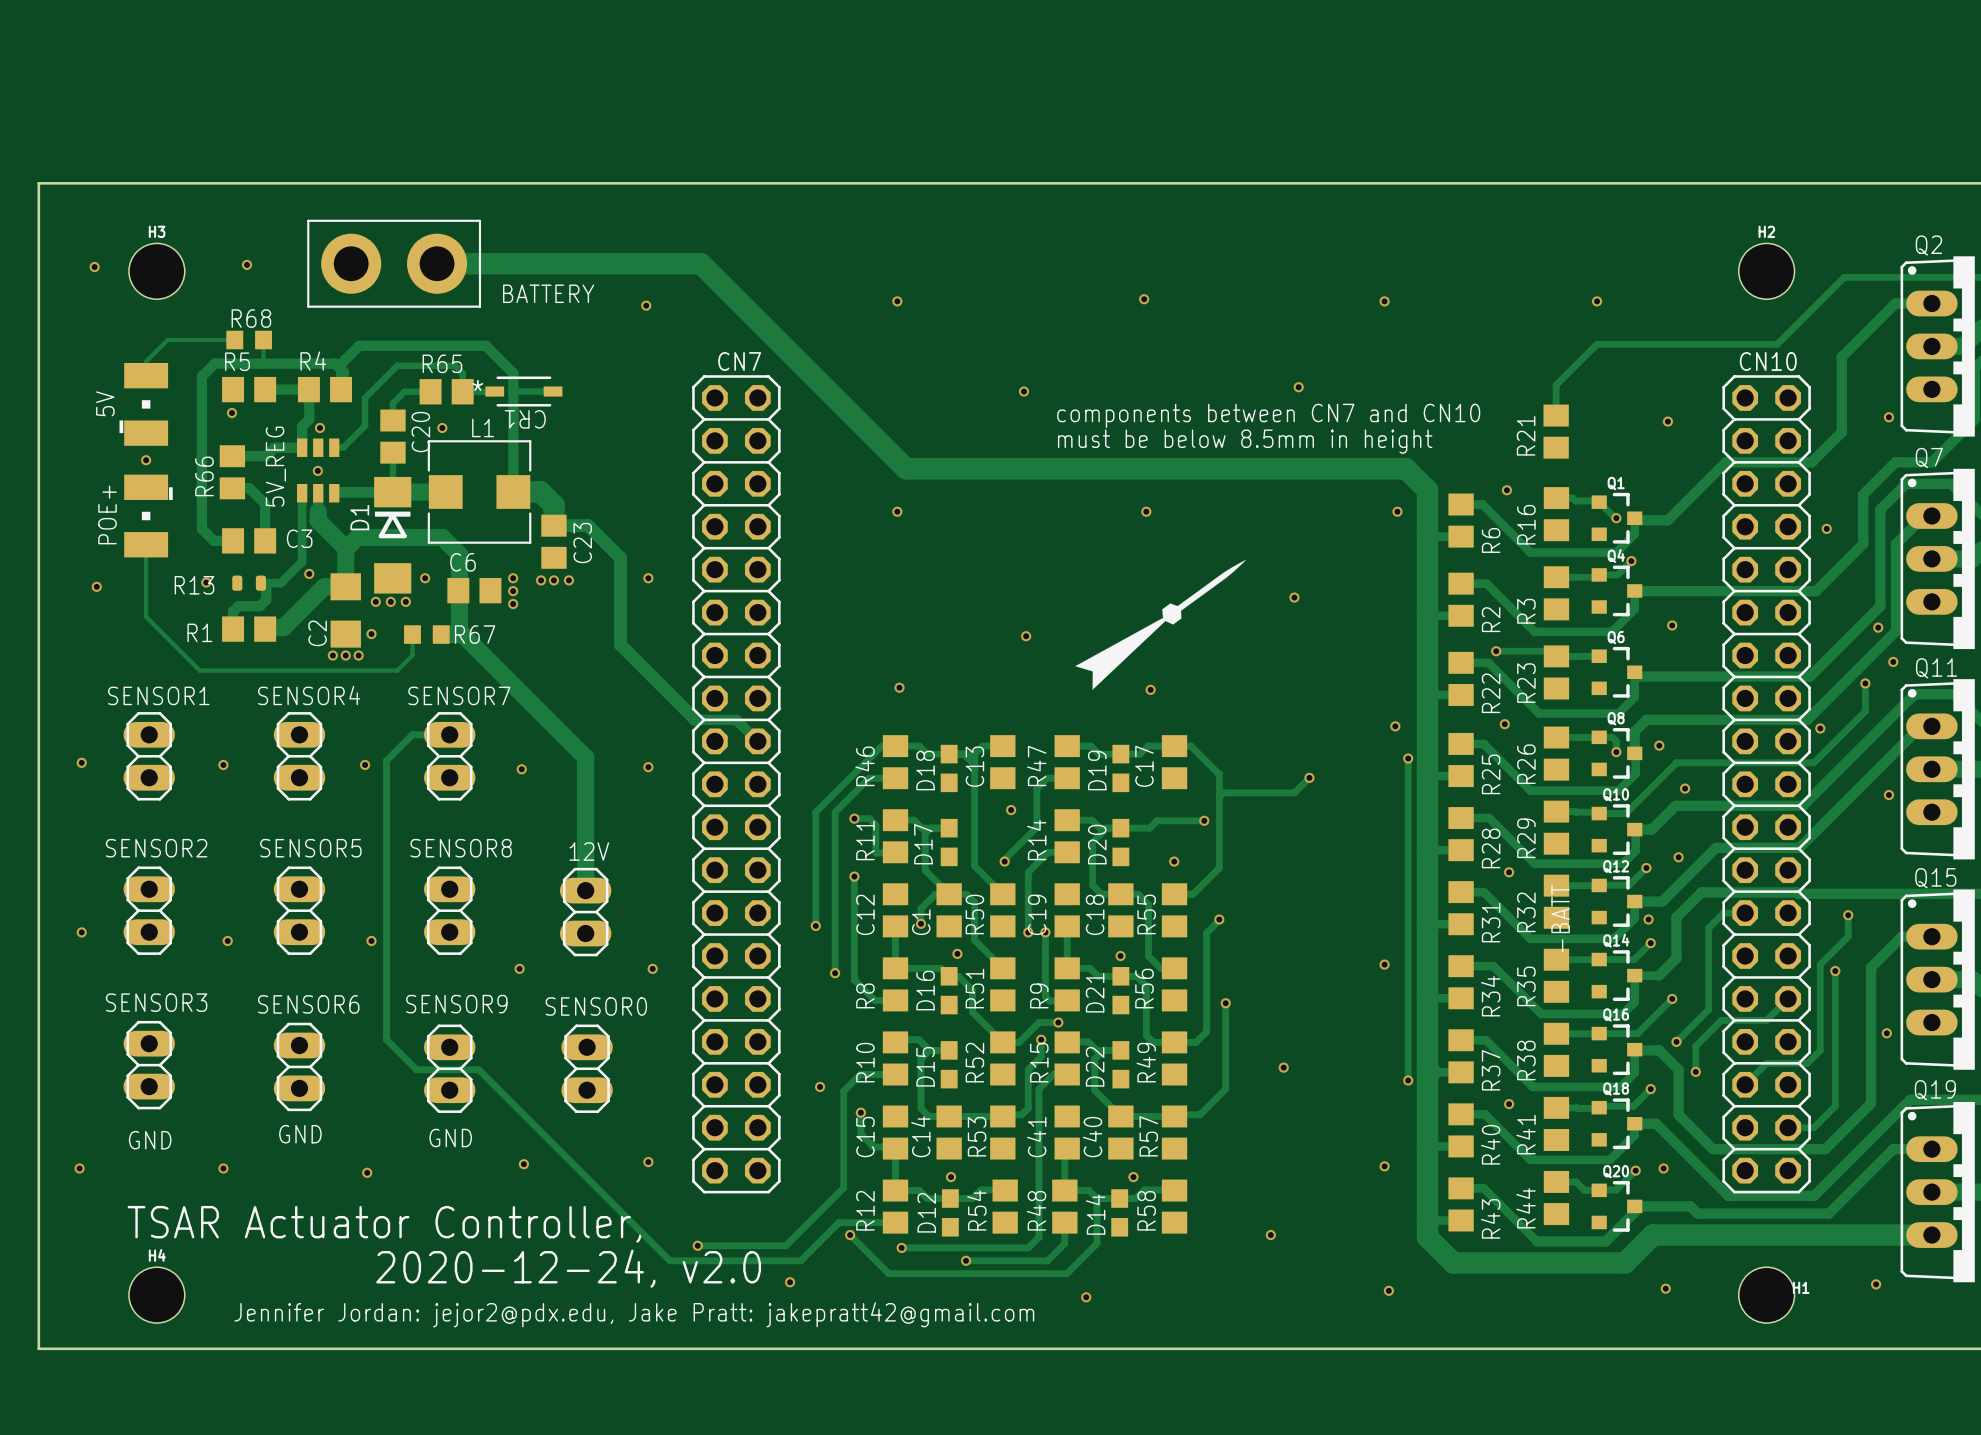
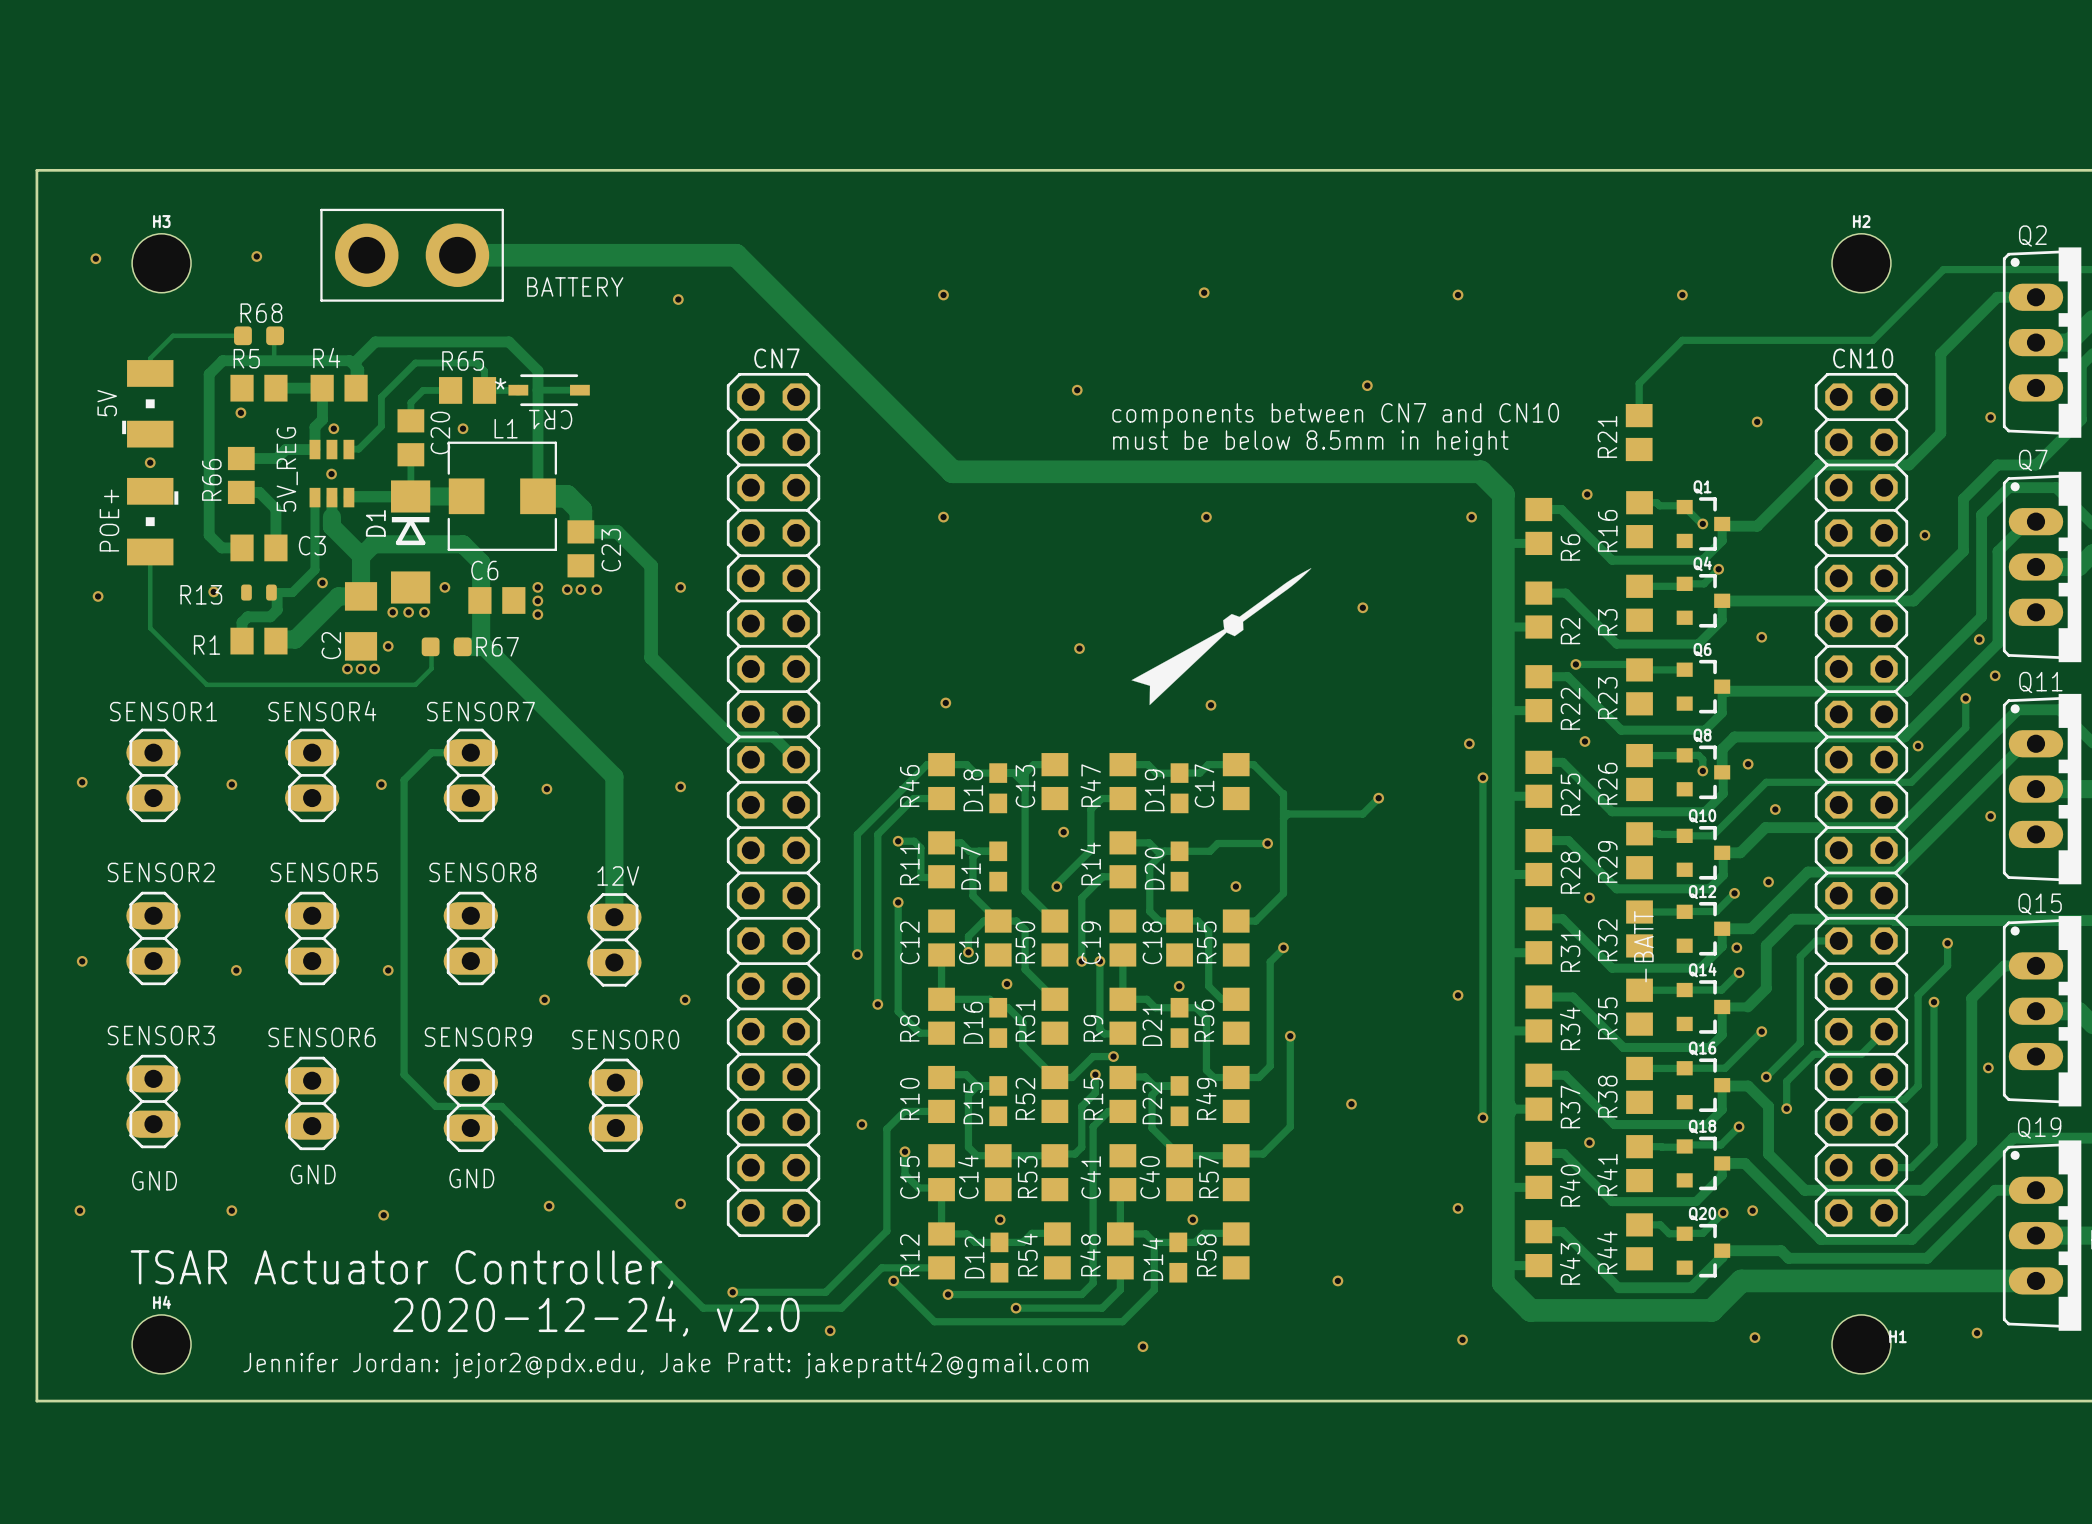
R68 footprint: [226, 330, 272, 350] -> [234, 326, 285, 346]
R67 footprint: [404, 625, 450, 644] -> [421, 637, 472, 657]

